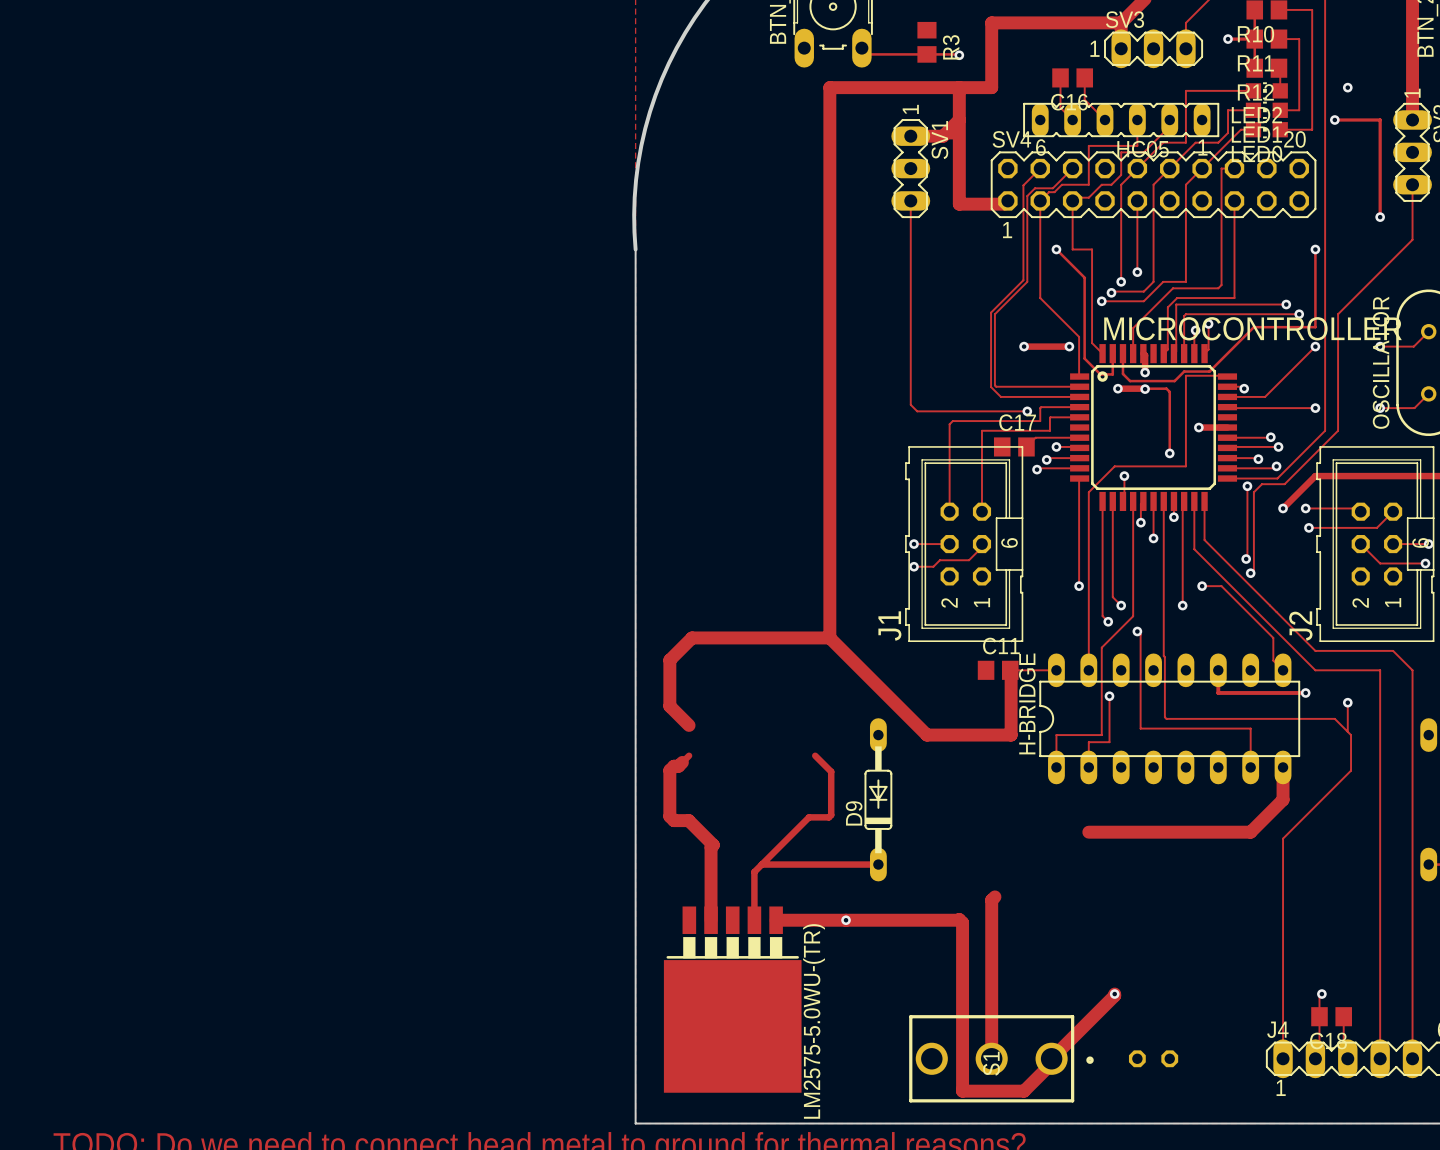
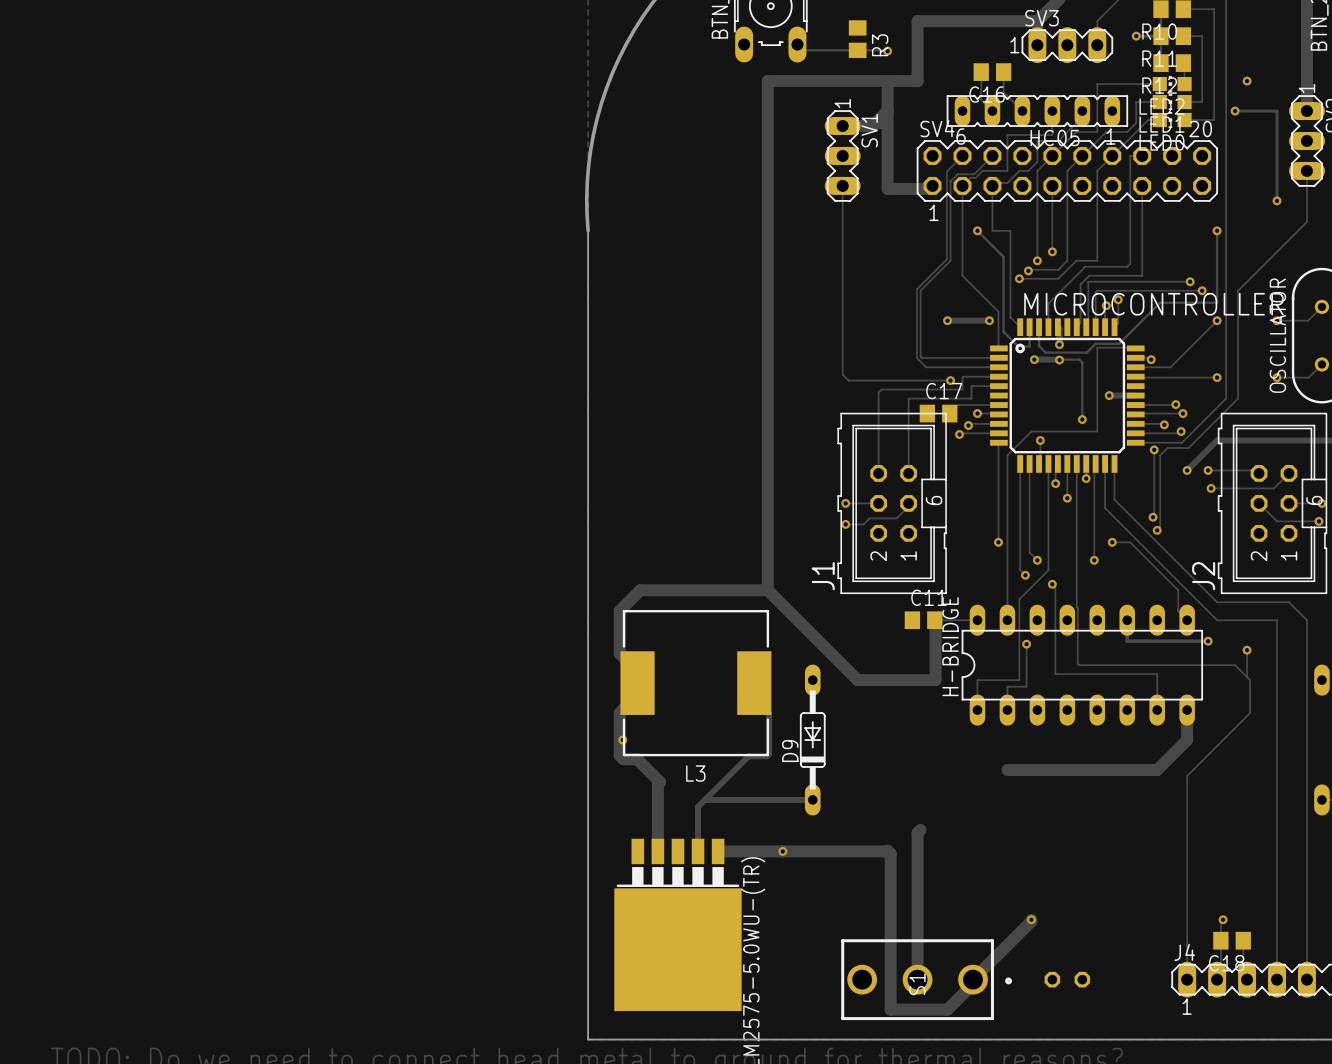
L3: none -> (695, 683)
via: none -> (622, 740)

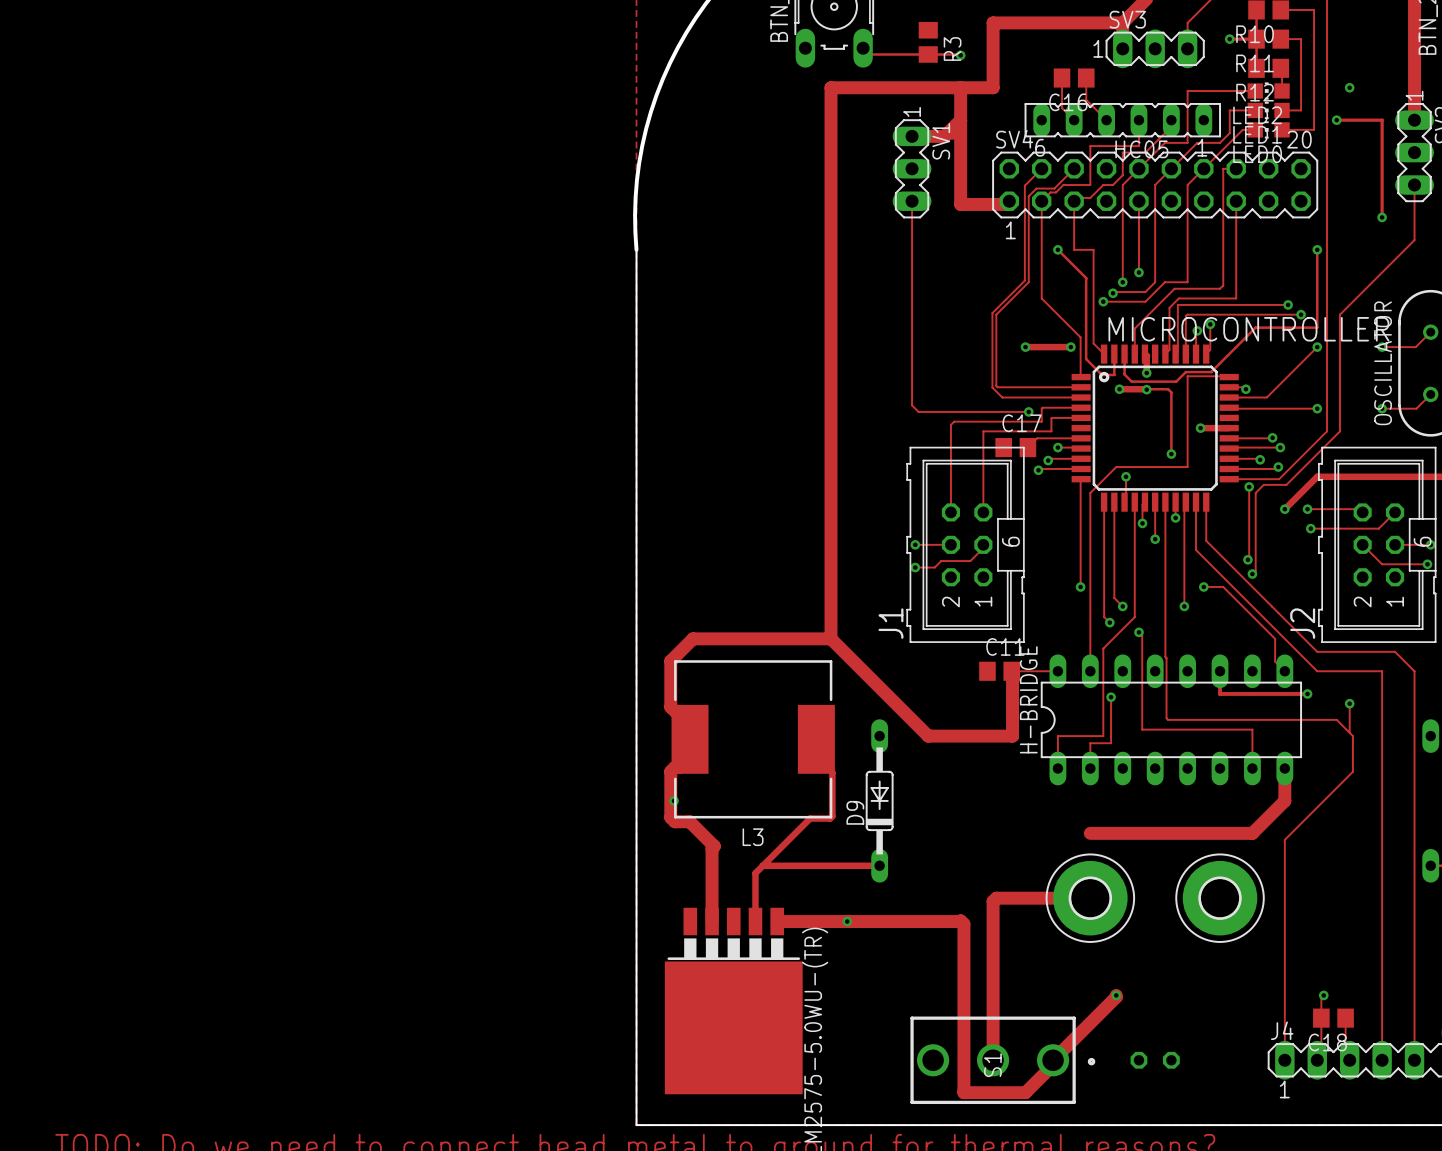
track: none -> (996, 898) (1090, 898)
part: none -> (1090, 898)
part: none -> (1220, 898)

